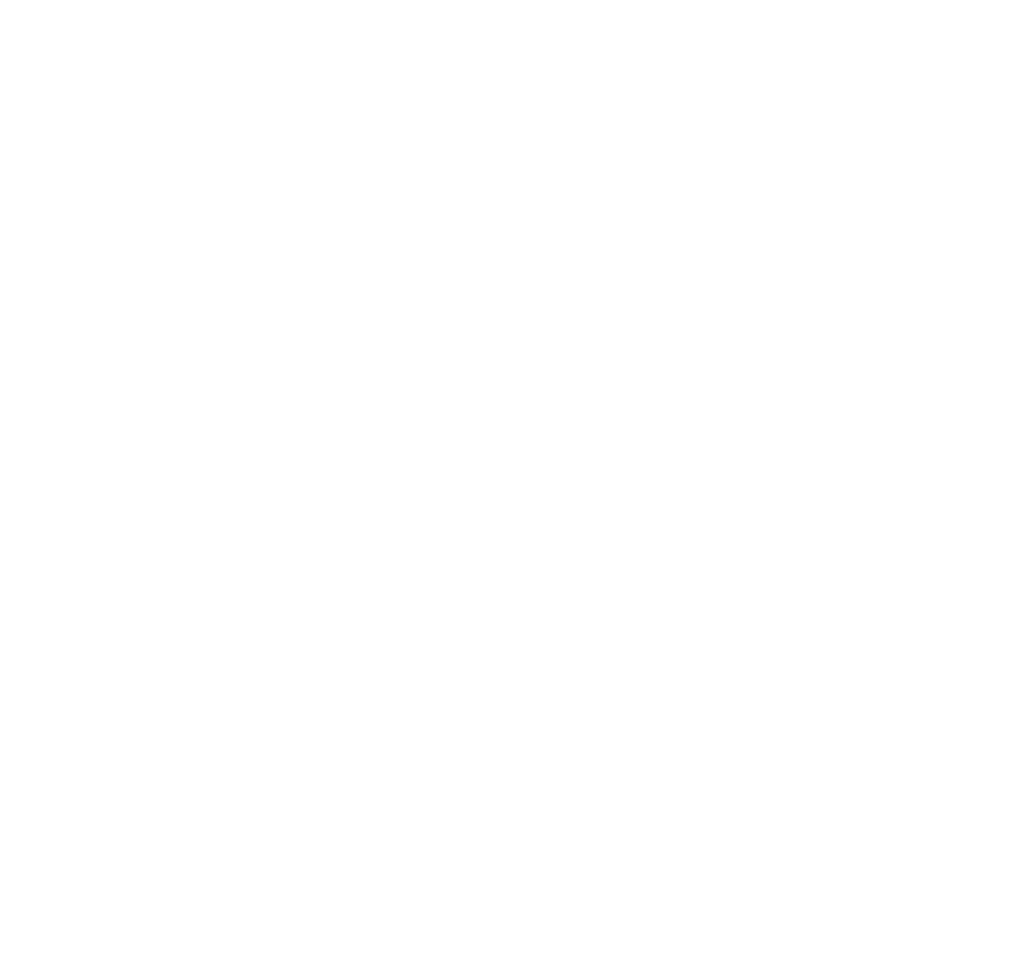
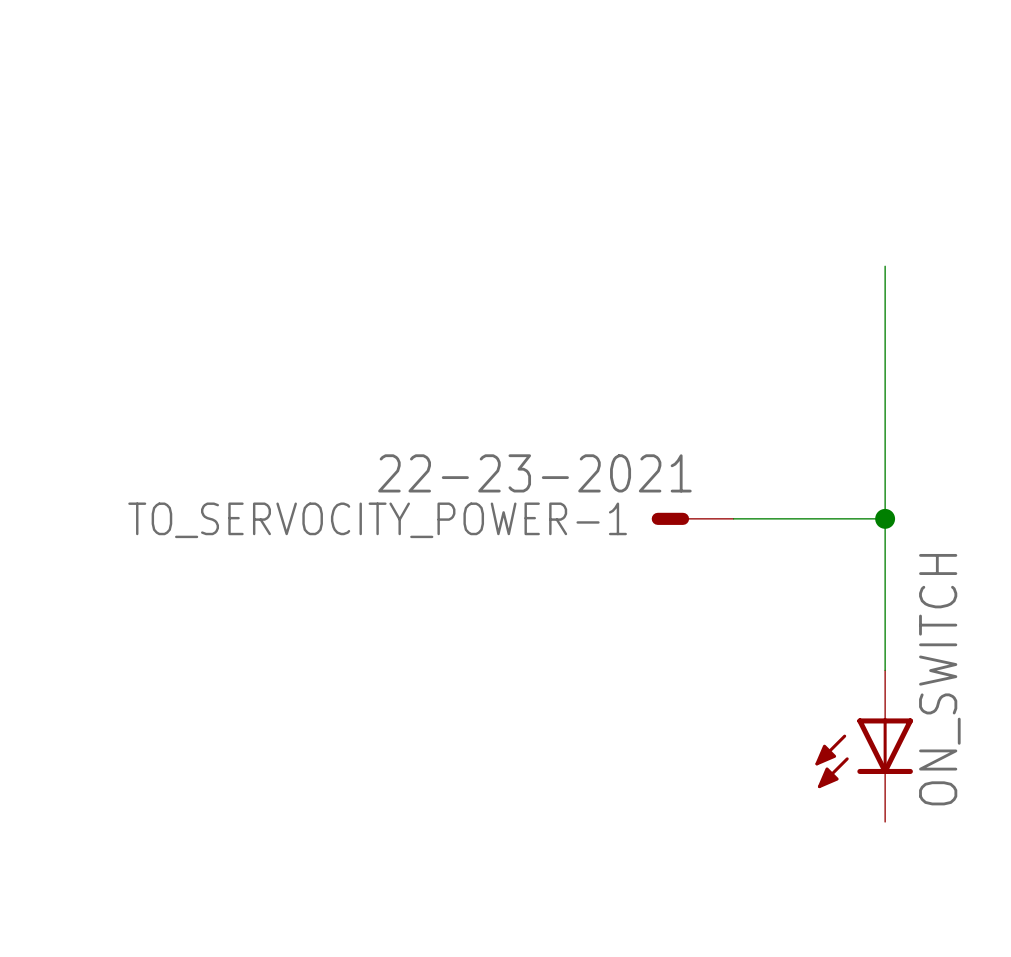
wire: none -> (885, 266) (885, 670)
TO_SERVOCITY_POWER-1: none -> 22-23-2021 (692, 518)
wire: none -> (733, 518) (885, 518)
junction: none -> (885, 518)
ON_SWITCH: none -> (864, 746)

